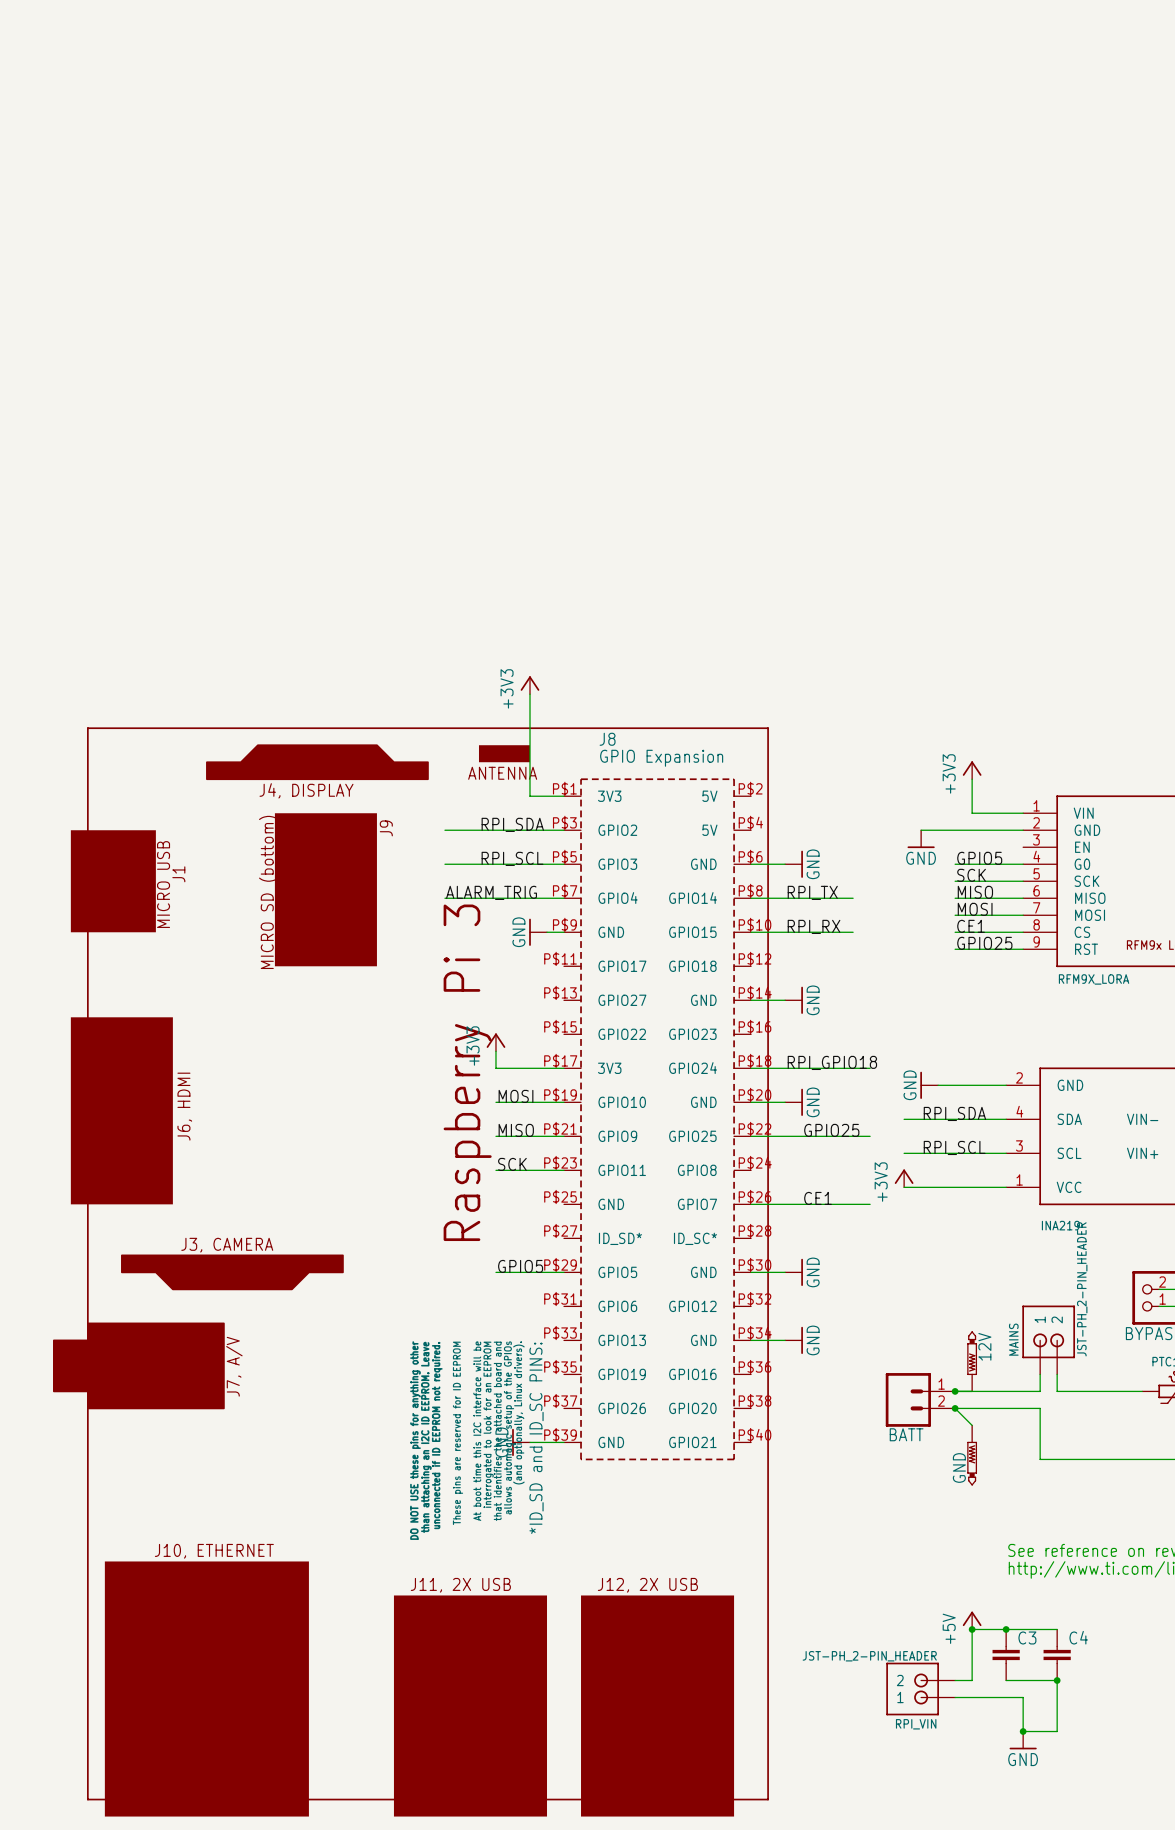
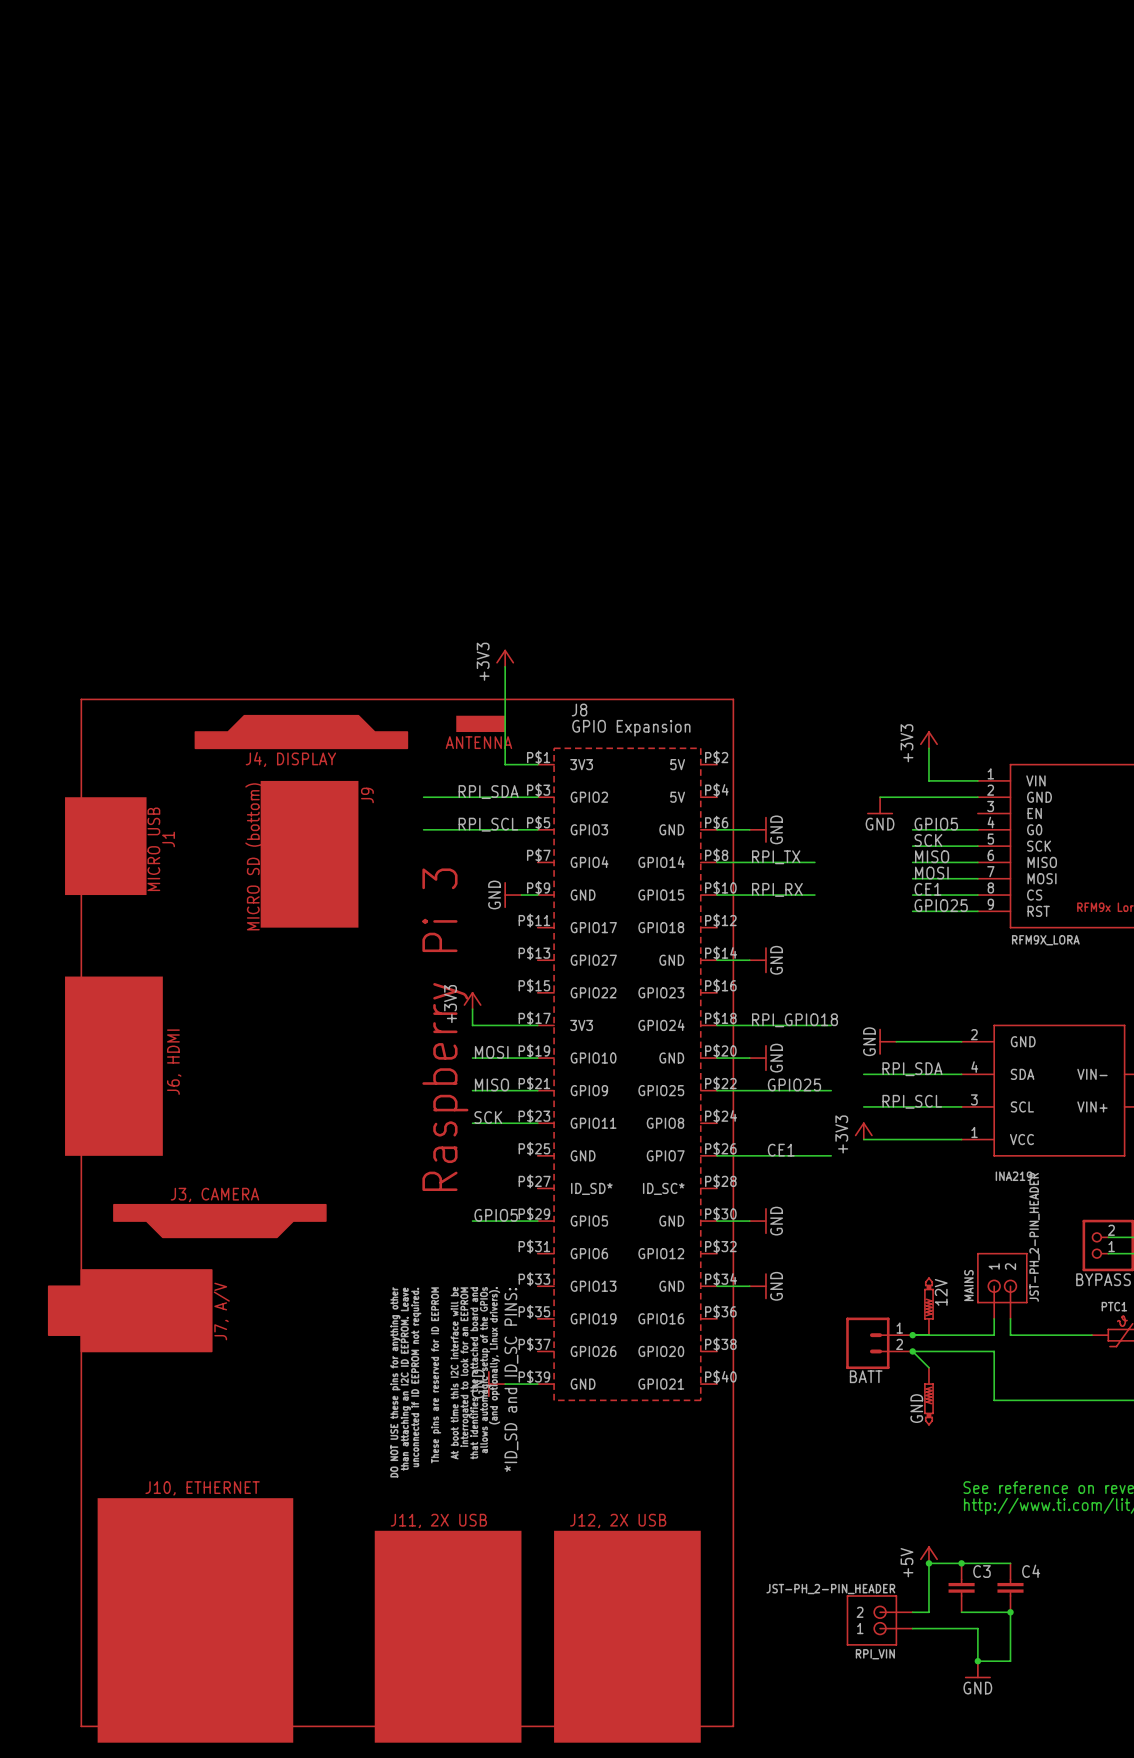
label: ALARM_TRIG (491, 892) -> none
wire: (444, 898) (564, 898) -> none

